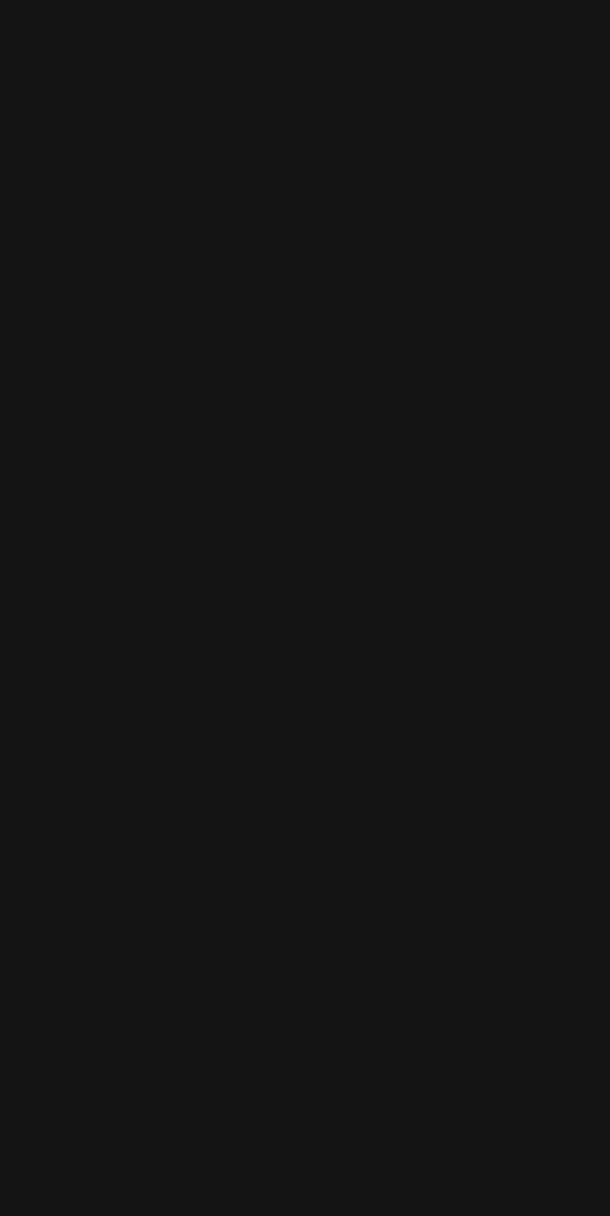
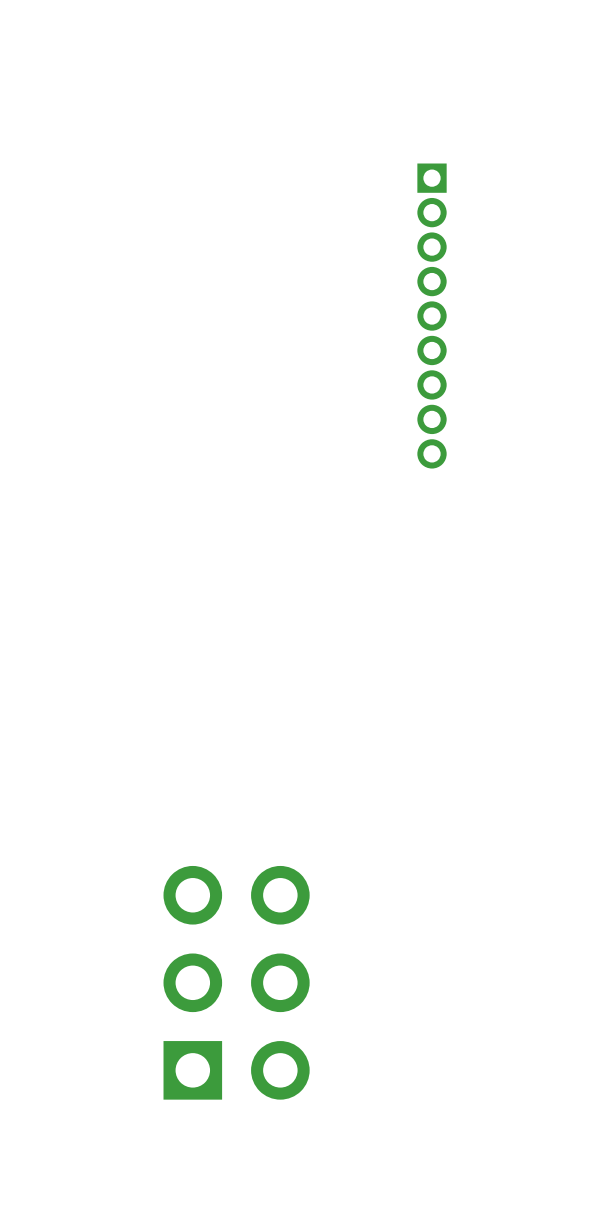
part: none -> (432, 316)
part: none -> (236, 982)

